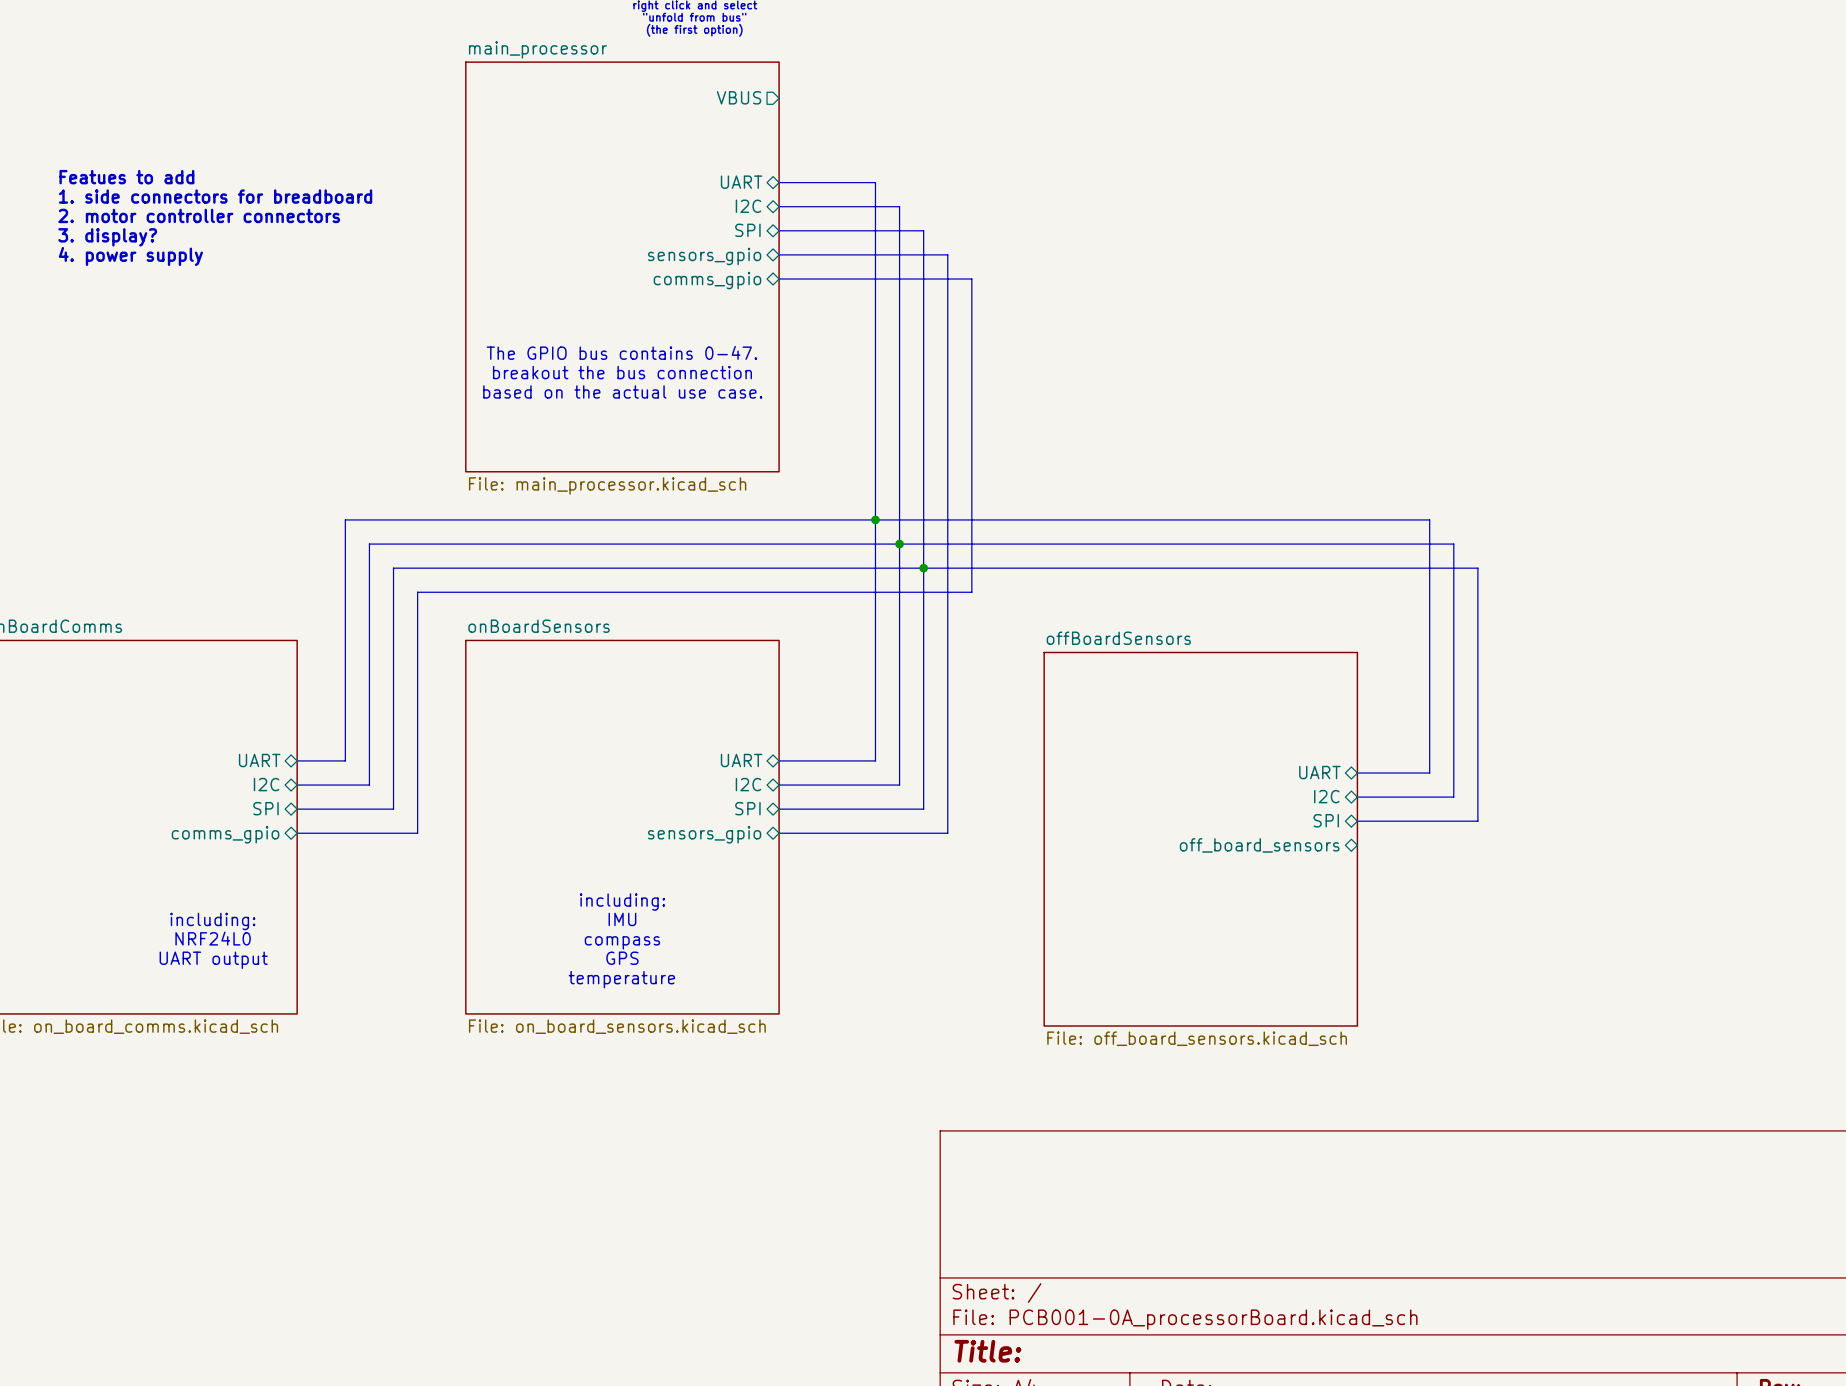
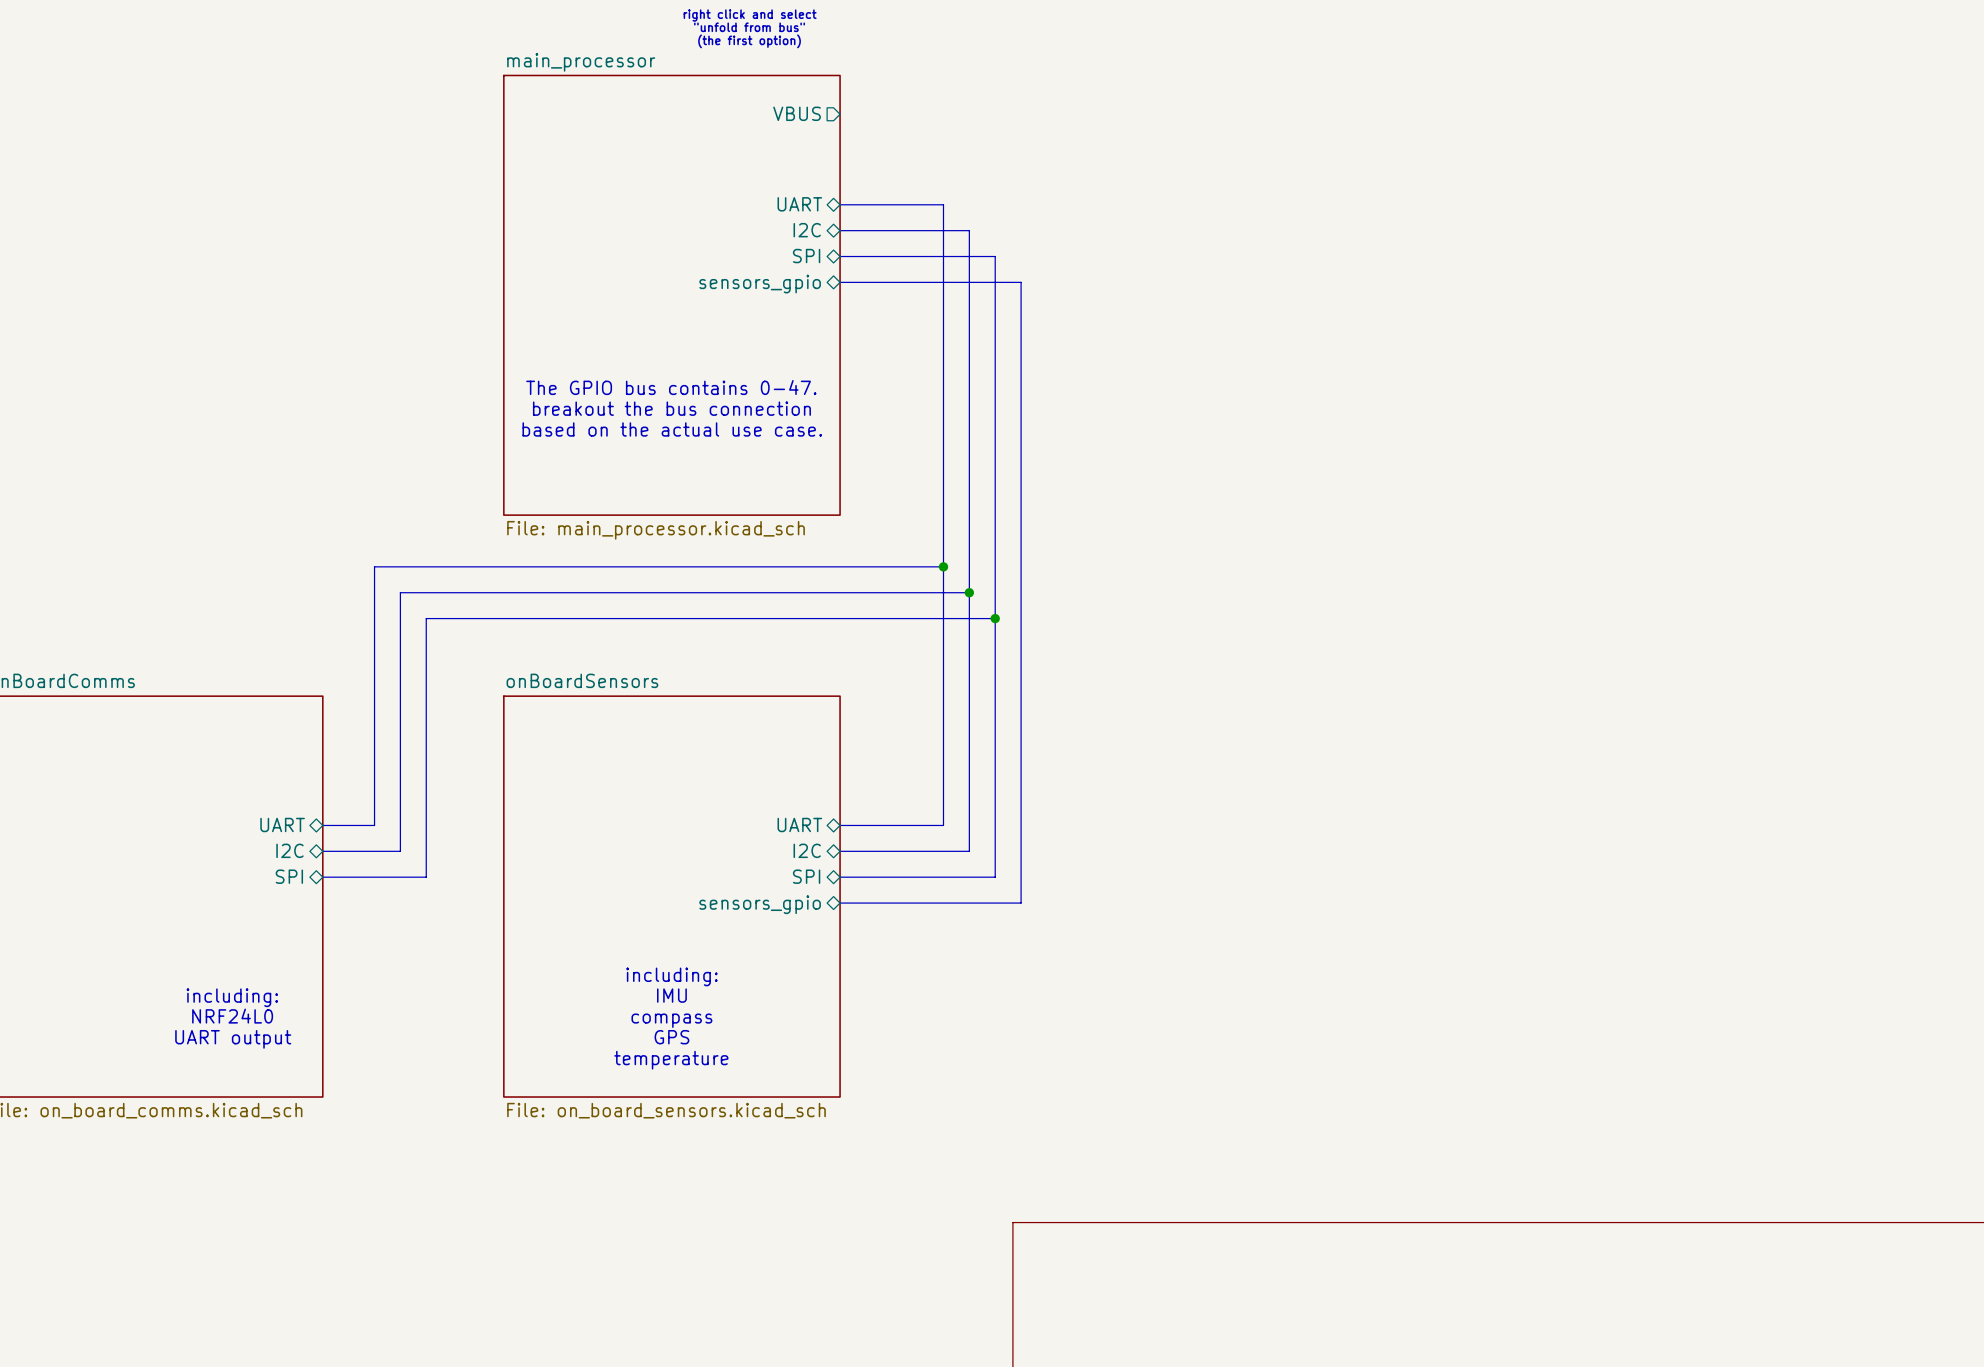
text: Featues to add (126, 177) -> none
text: 1. side connectors for breadboard (215, 196) -> none
text: 2. motor controller connectors (199, 215) -> none
text: 3. display? (107, 237) -> none
text: 4. power supply (130, 256) -> none
bus: (779, 279) (971, 279) (971, 592) (417, 592) (417, 833) (297, 833) -> none
sheet pin: comms_gpio (707, 280) -> none
bus: (875, 519) (1429, 519) (1429, 772) (1357, 772) -> none
bus: (899, 544) (1453, 544) (1453, 797) (1357, 797) -> none
bus: (923, 568) (1477, 568) (1477, 821) (1357, 821) -> none
sheet pin: UART (1319, 772) -> none
sheet pin: I2C (1326, 796) -> none
sheet pin: SPI (1326, 820) -> none
sheet pin: comms_gpio (225, 834) -> none
sheet offBoardSensors: File: off_board_sensors.kicad_sch (1200, 839) -> none
sheet pin: off_board_sensors (1259, 845) -> none

